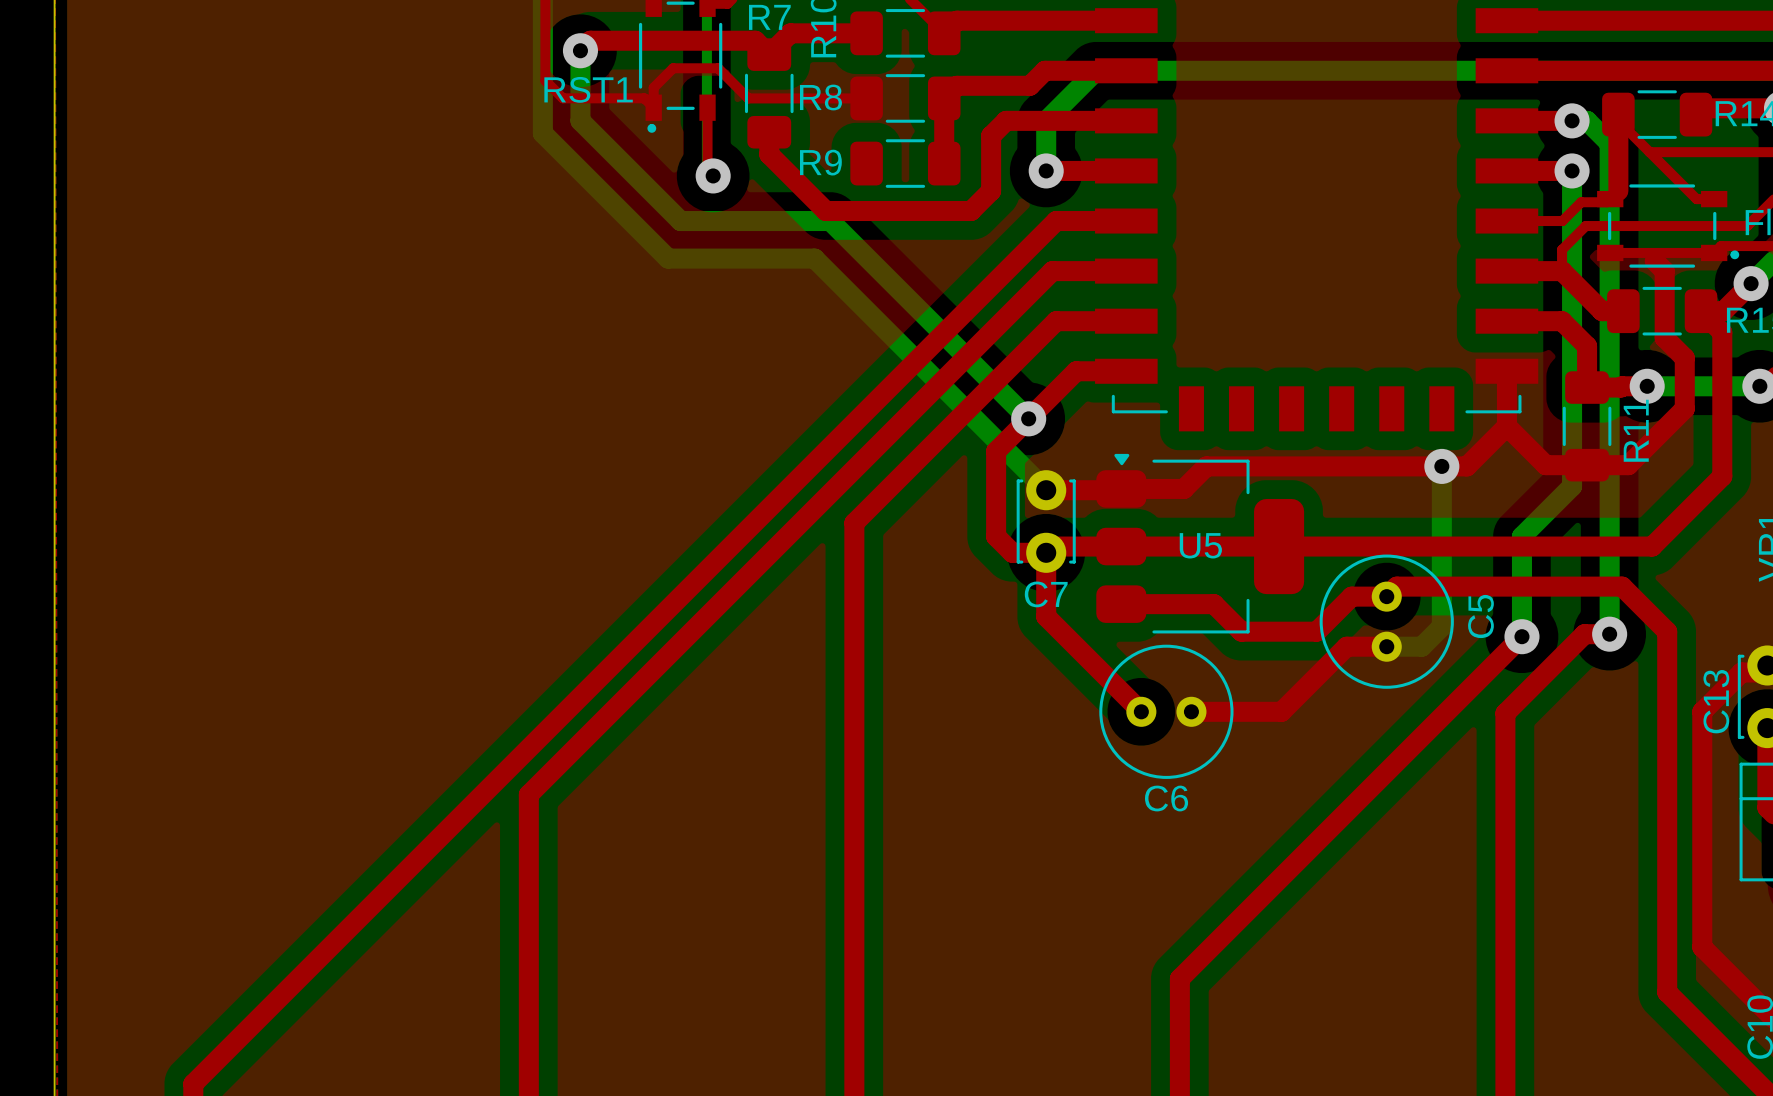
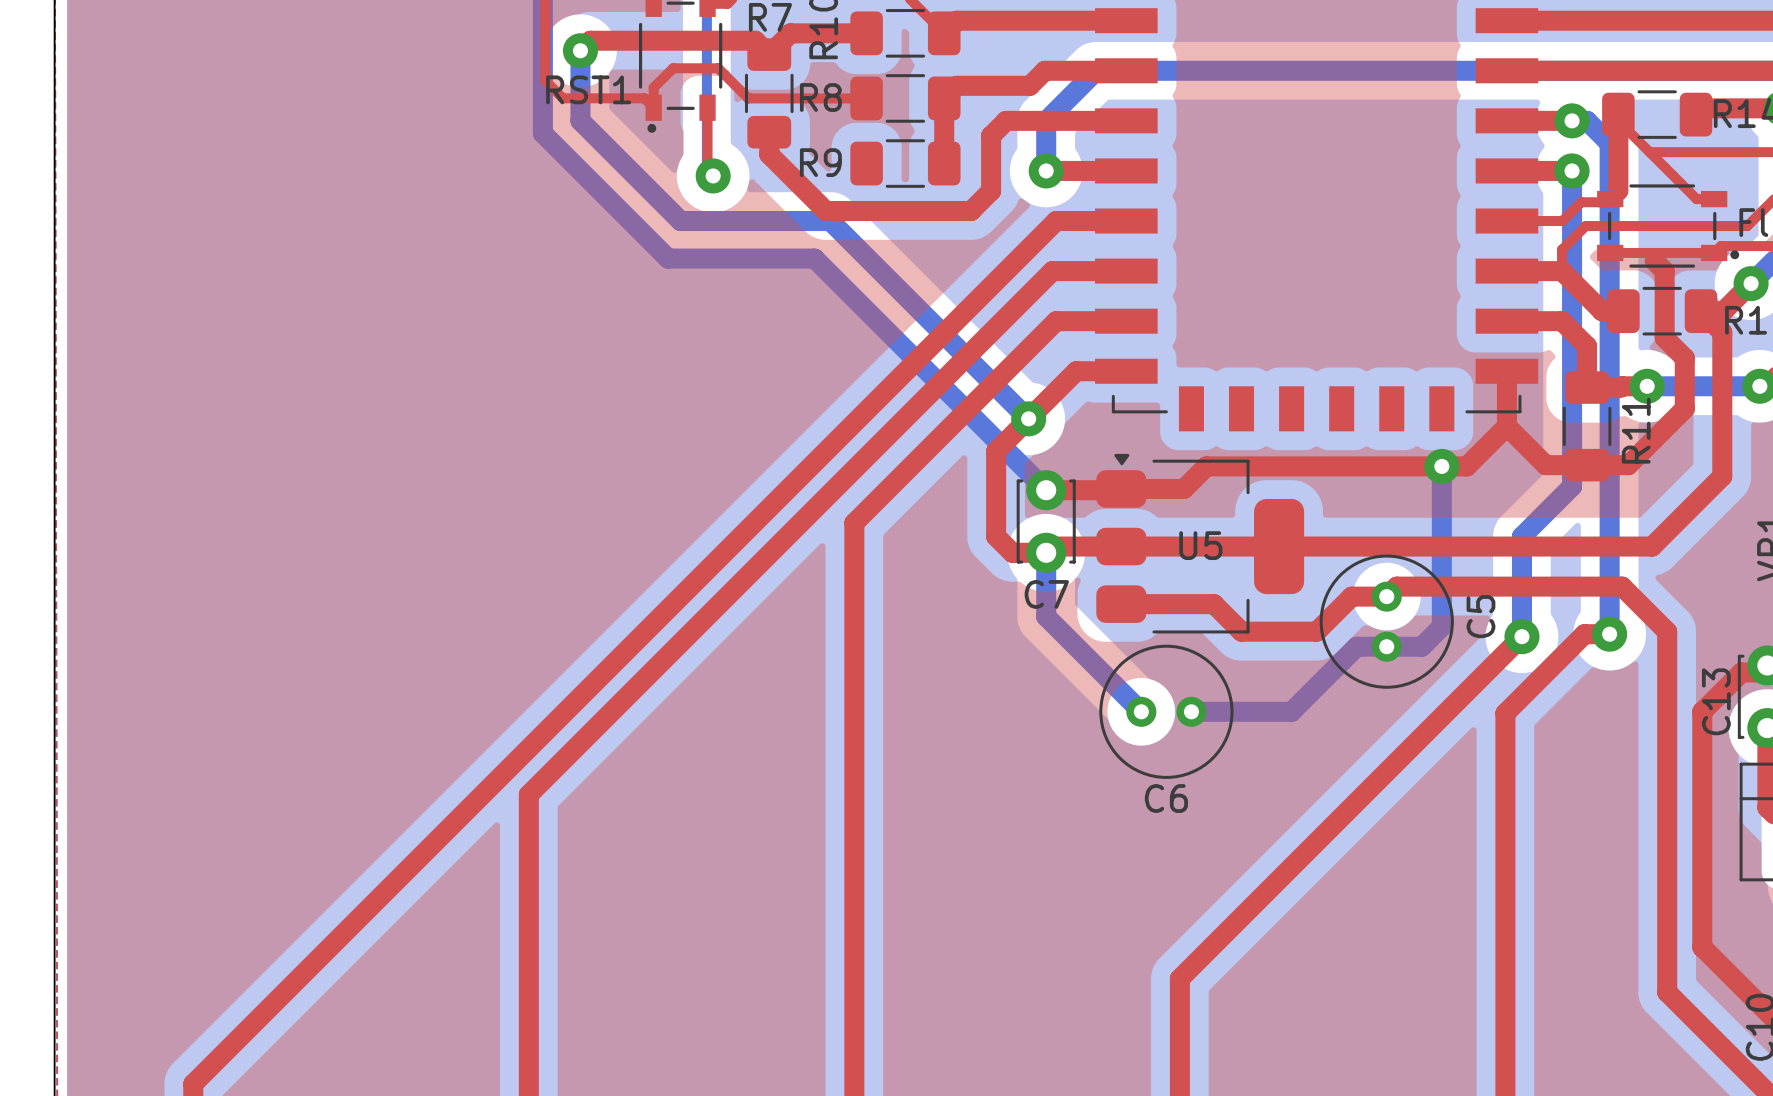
top track: (1046, 552) (1046, 616) (1141, 711) -> none
bottom track: none -> (1046, 552) (1046, 616) (1141, 711)
top track: (1386, 646) (1346, 646) (1281, 711) (1191, 711) -> none
bottom track: none -> (1386, 646) (1356, 646) (1291, 711) (1191, 711)

